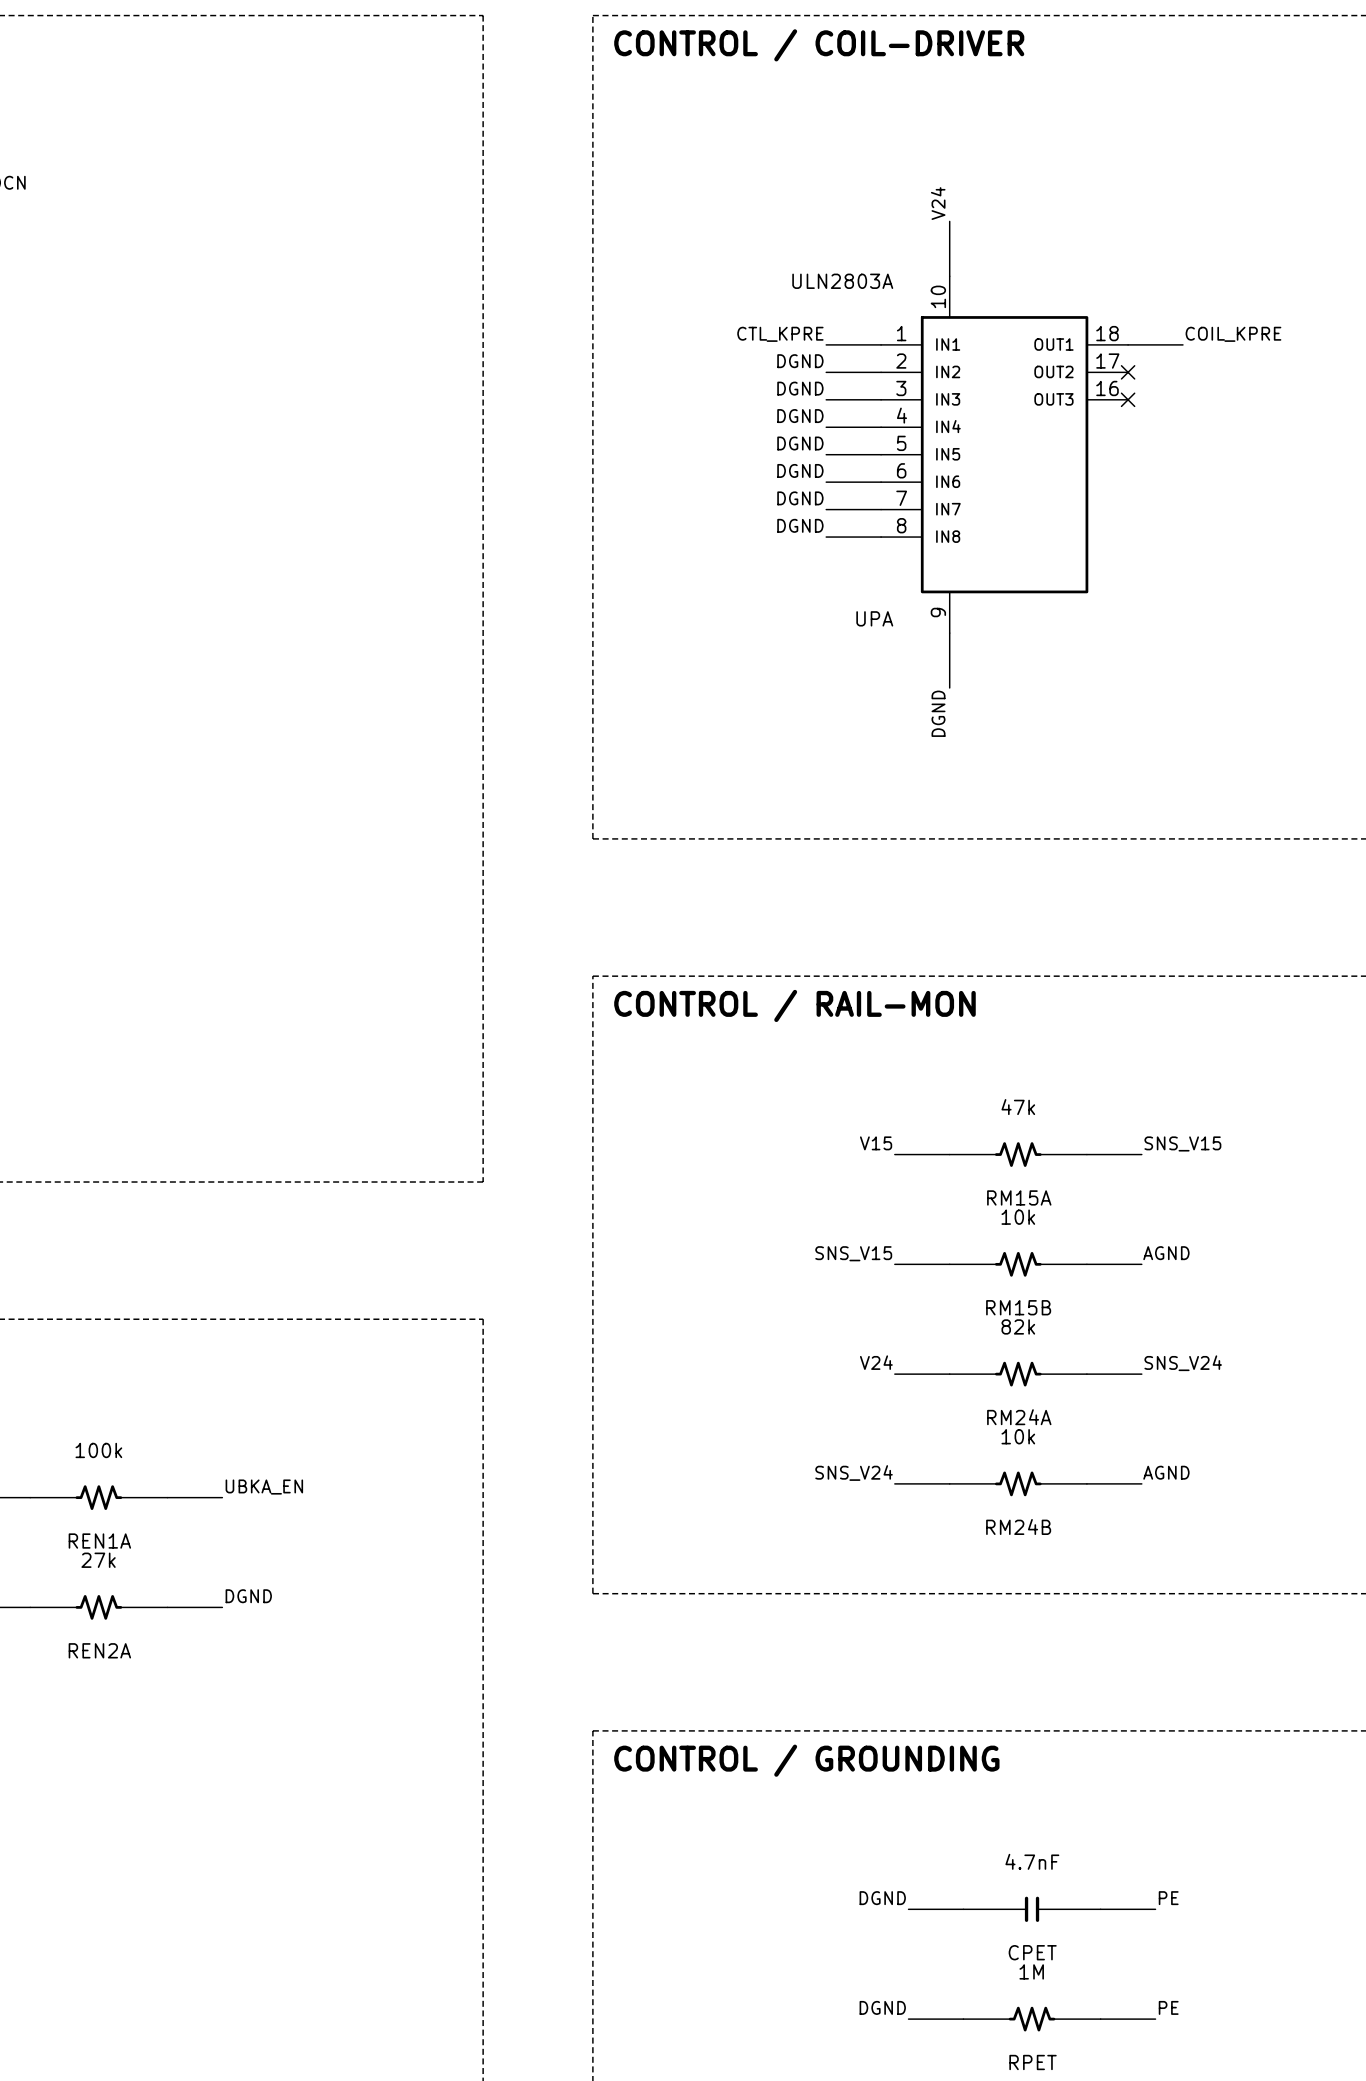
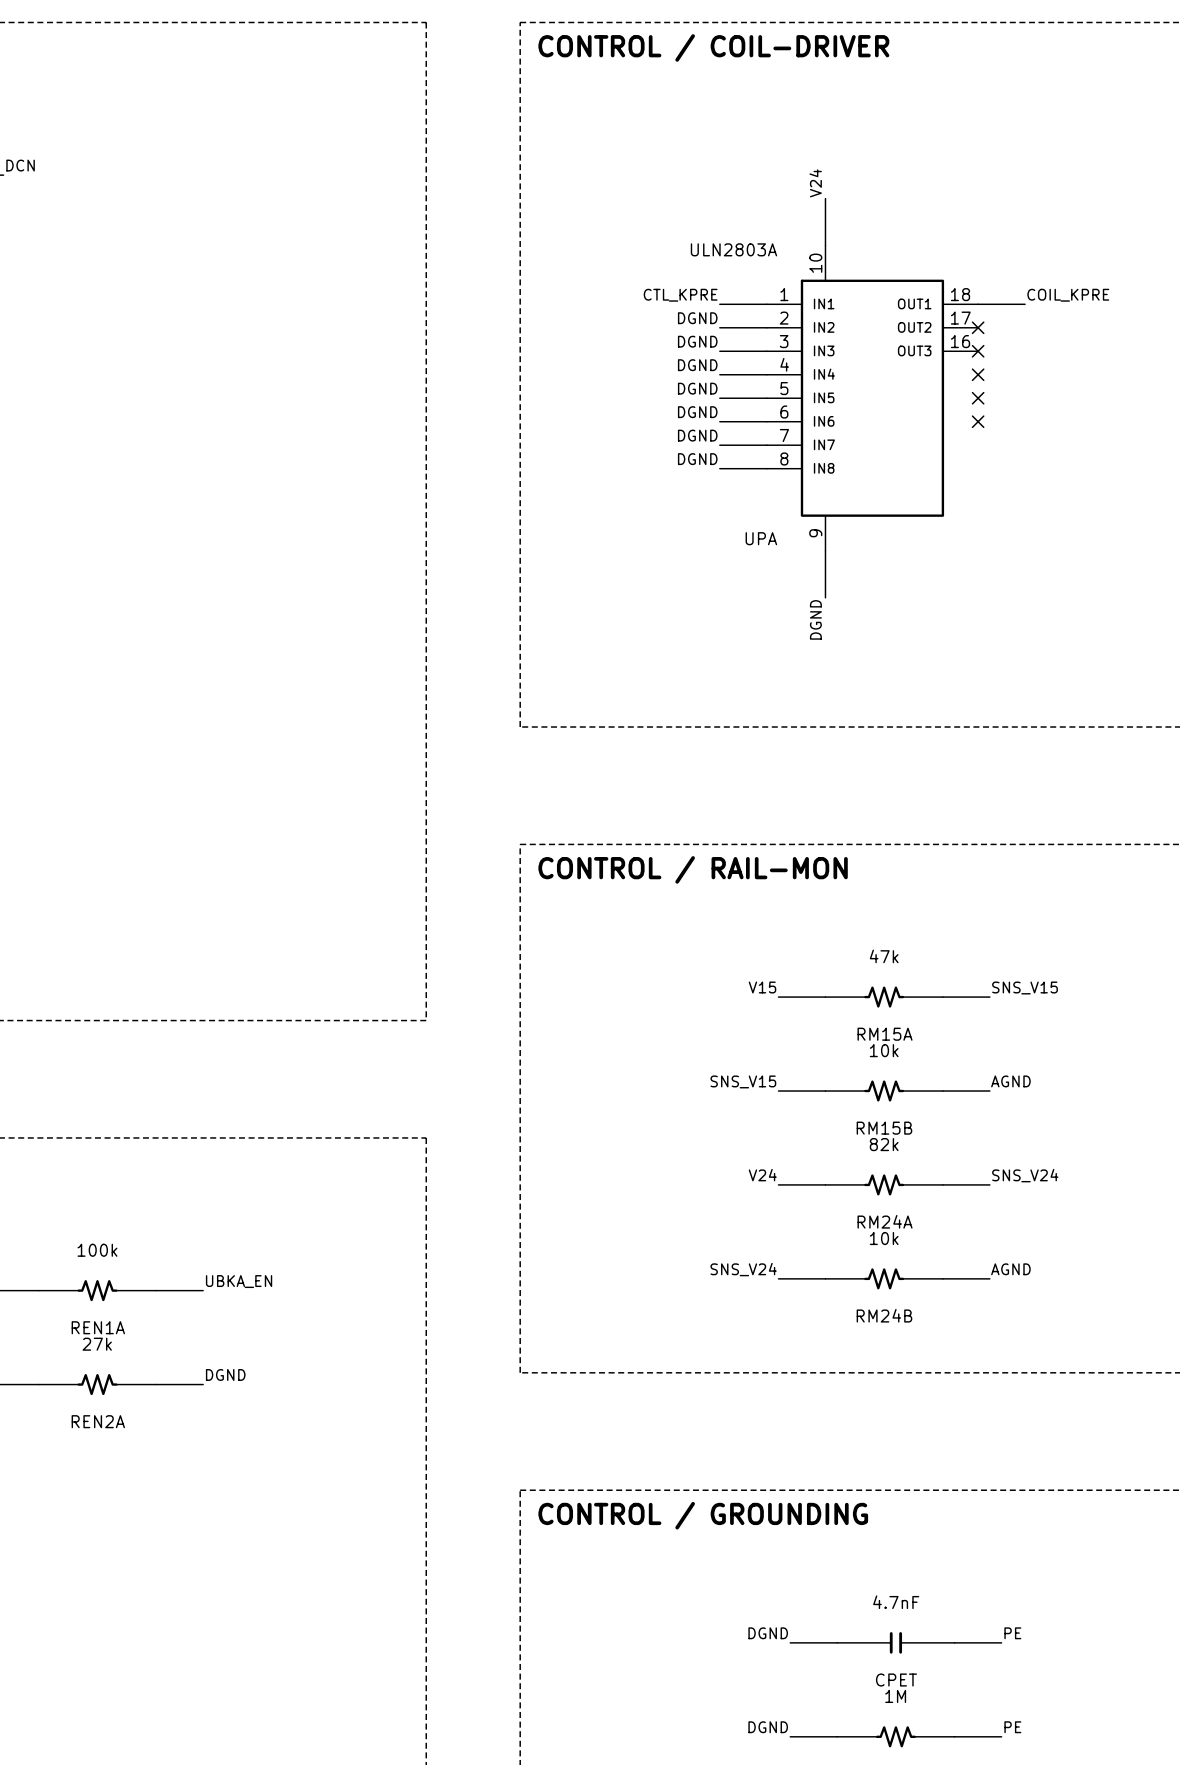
no-connect mark: none -> (978, 374)
no-connect mark: none -> (978, 398)
no-connect mark: none -> (978, 421)

